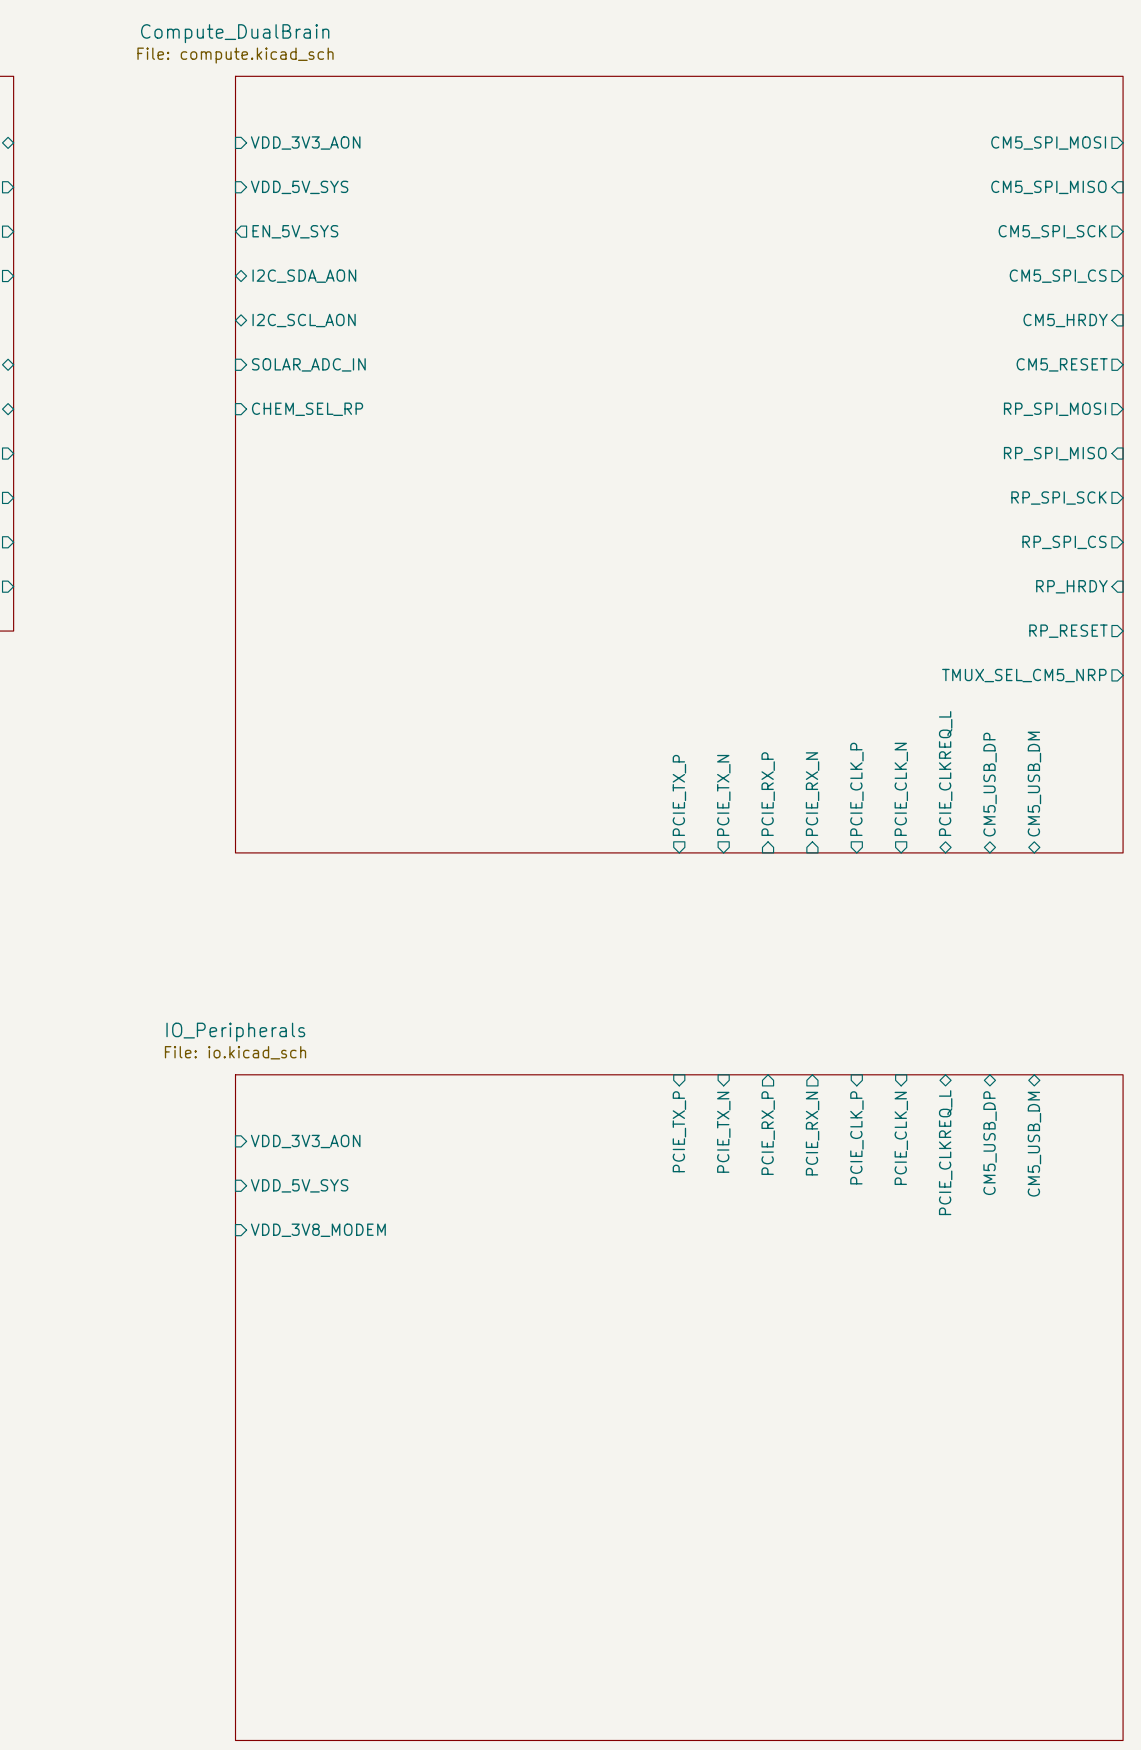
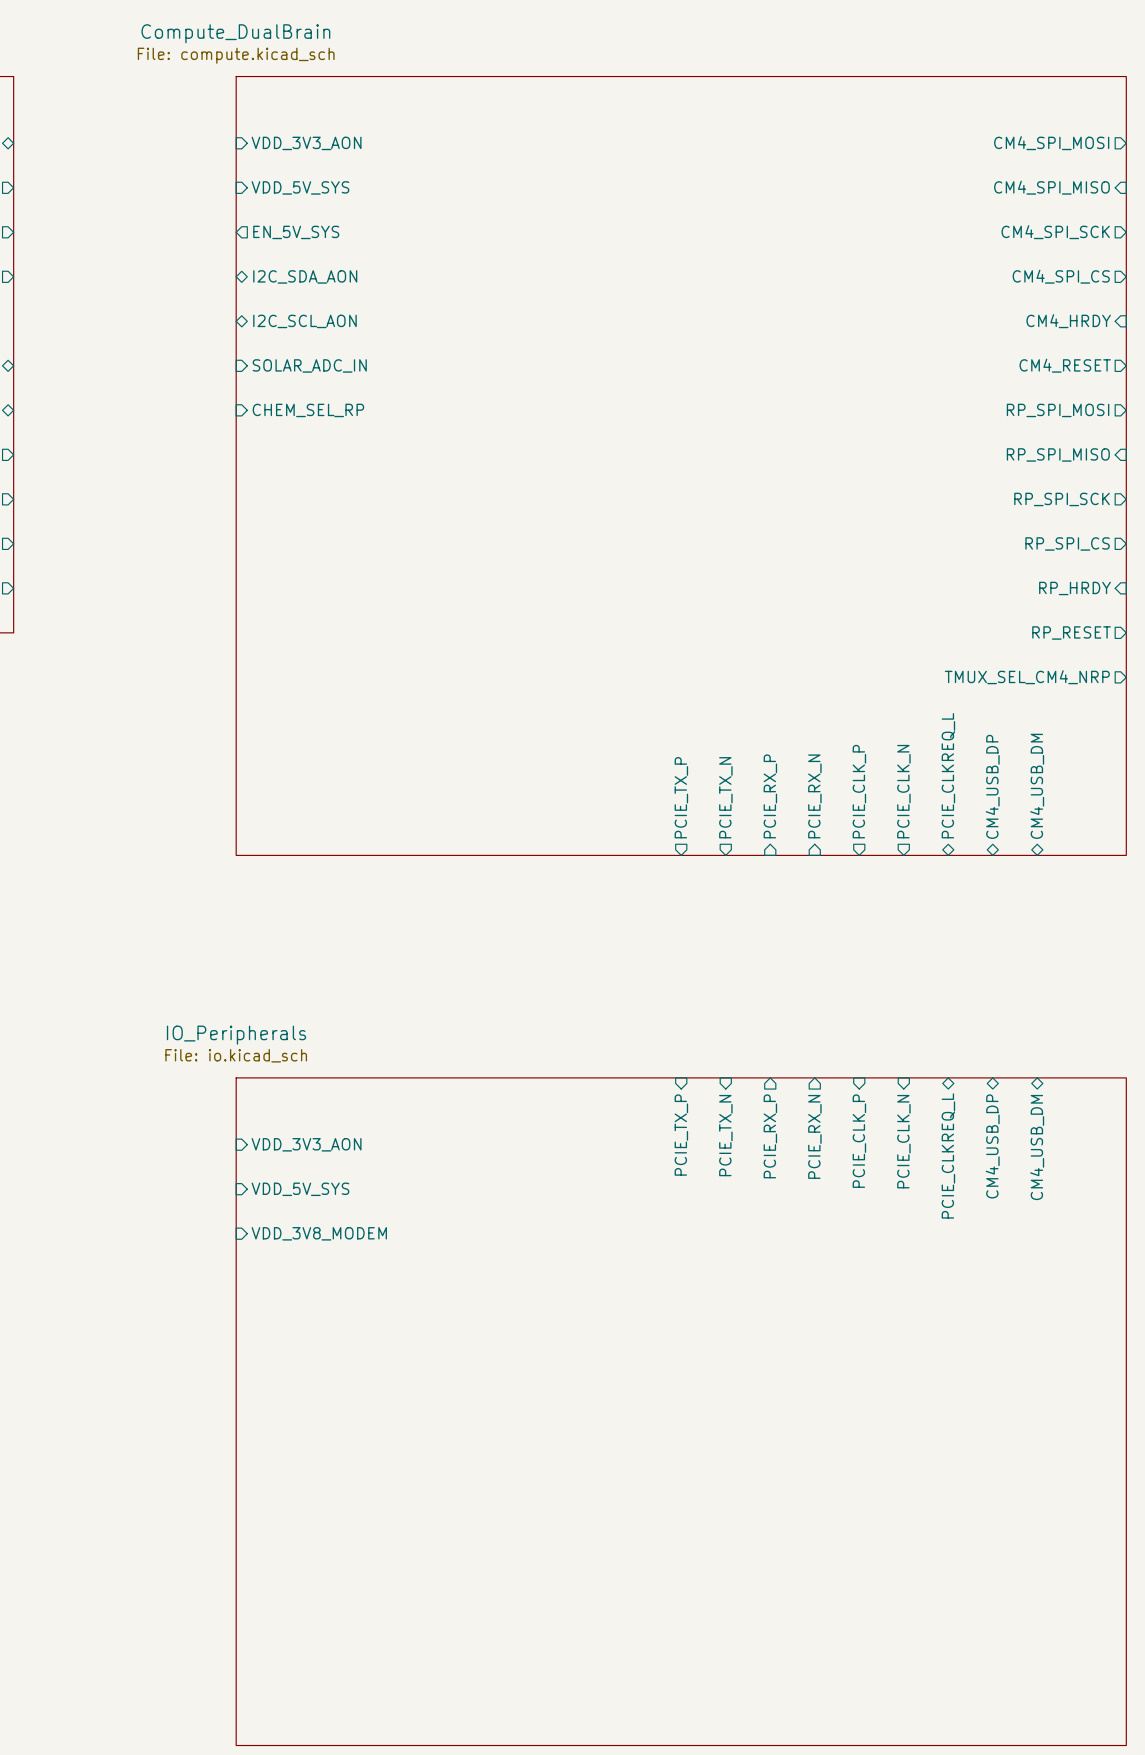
sheet pin: CM5_SPI_MOSI (1048, 143) -> CM4_SPI_MOSI (1051, 143)
sheet pin: CM5_SPI_MISO (1048, 187) -> CM4_SPI_MISO (1051, 187)
sheet pin: CM5_SPI_SCK (1052, 231) -> CM4_SPI_SCK (1055, 232)
sheet pin: CM5_SPI_CS (1058, 276) -> CM4_SPI_CS (1061, 276)
sheet pin: CM5_HRDY (1065, 320) -> CM4_HRDY (1068, 321)
sheet pin: CM5_RESET (1062, 364) -> CM4_RESET (1065, 365)
sheet pin: TMUX_SEL_CM5_NRP (1024, 675) -> TMUX_SEL_CM4_NRP (1027, 677)
sheet pin: CM5_USB_DP (990, 784) -> CM4_USB_DP (992, 786)
sheet pin: CM5_USB_DM (1034, 784) -> CM4_USB_DM (1037, 786)
sheet pin: CM5_USB_DP (990, 1143) -> CM4_USB_DP (992, 1146)
sheet pin: CM5_USB_DM (1034, 1144) -> CM4_USB_DM (1037, 1147)

